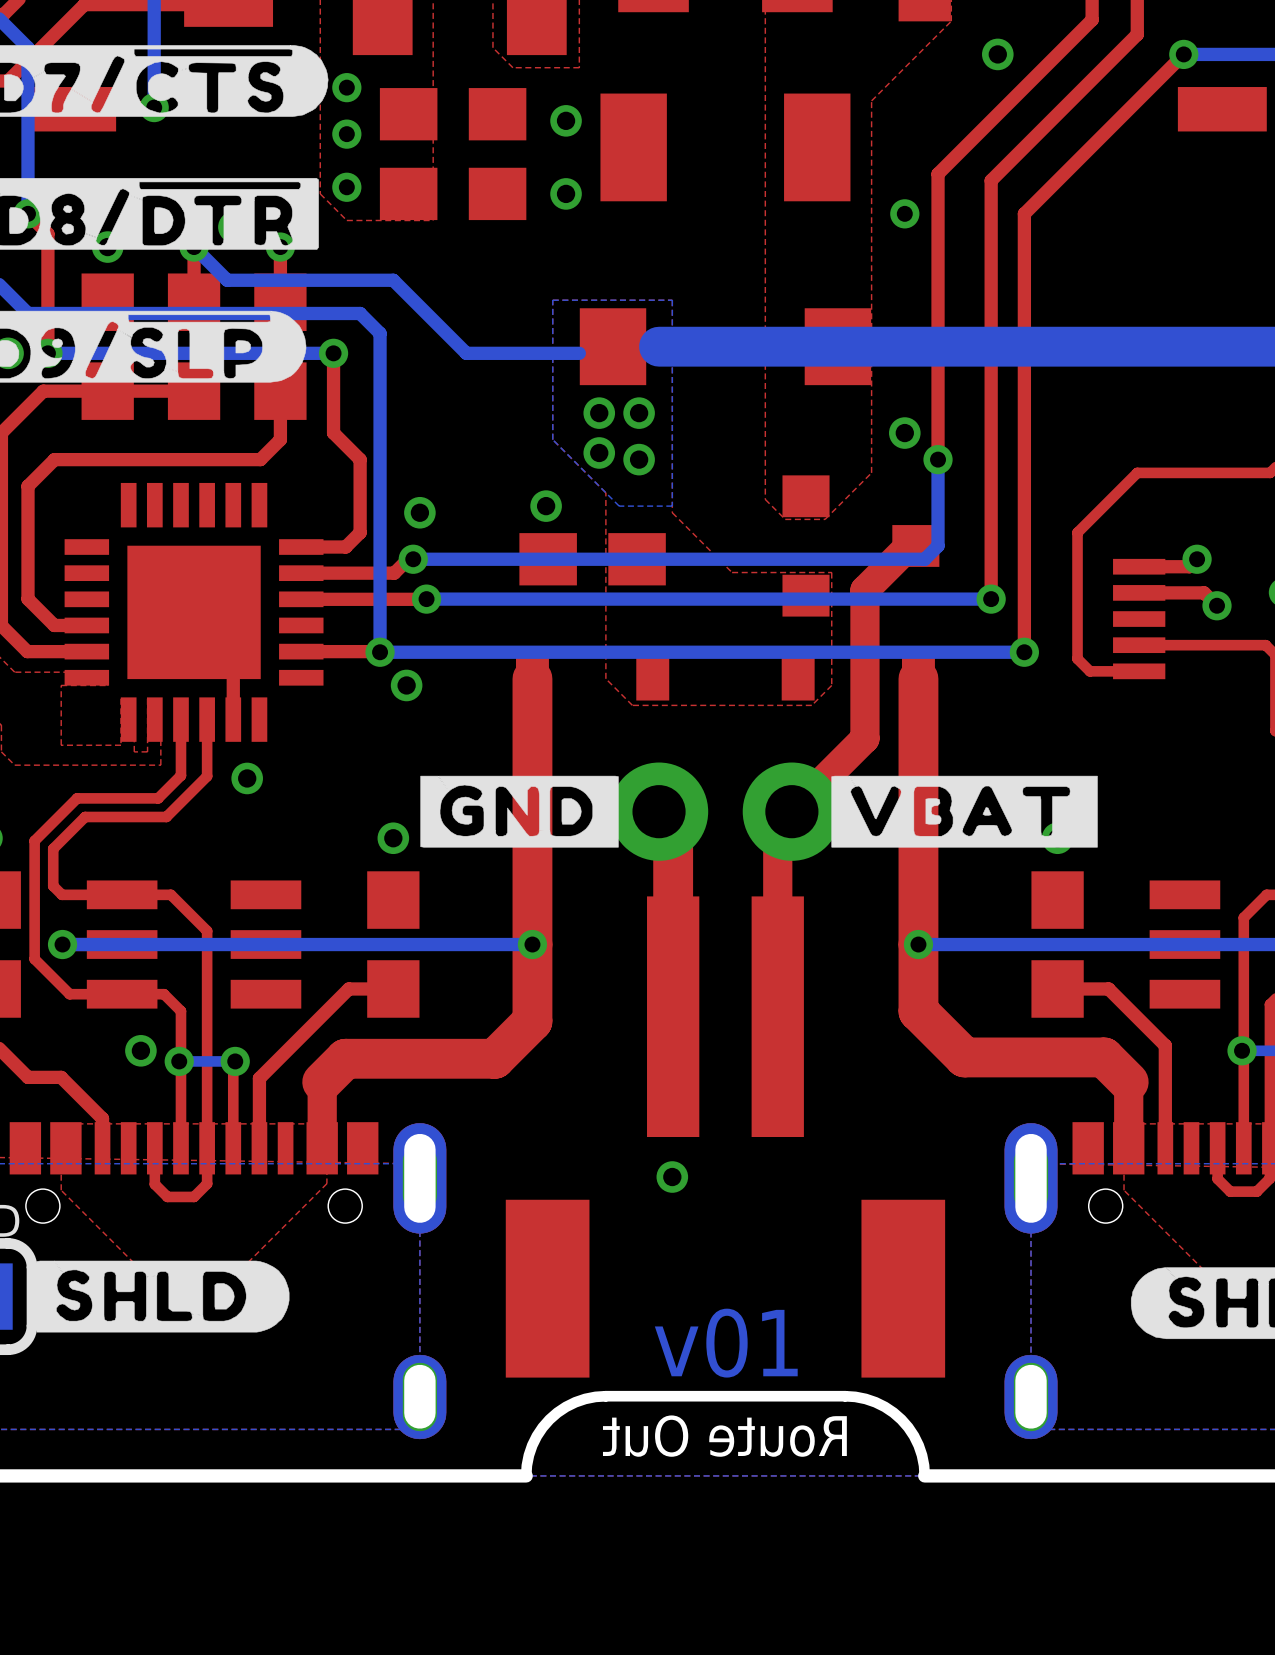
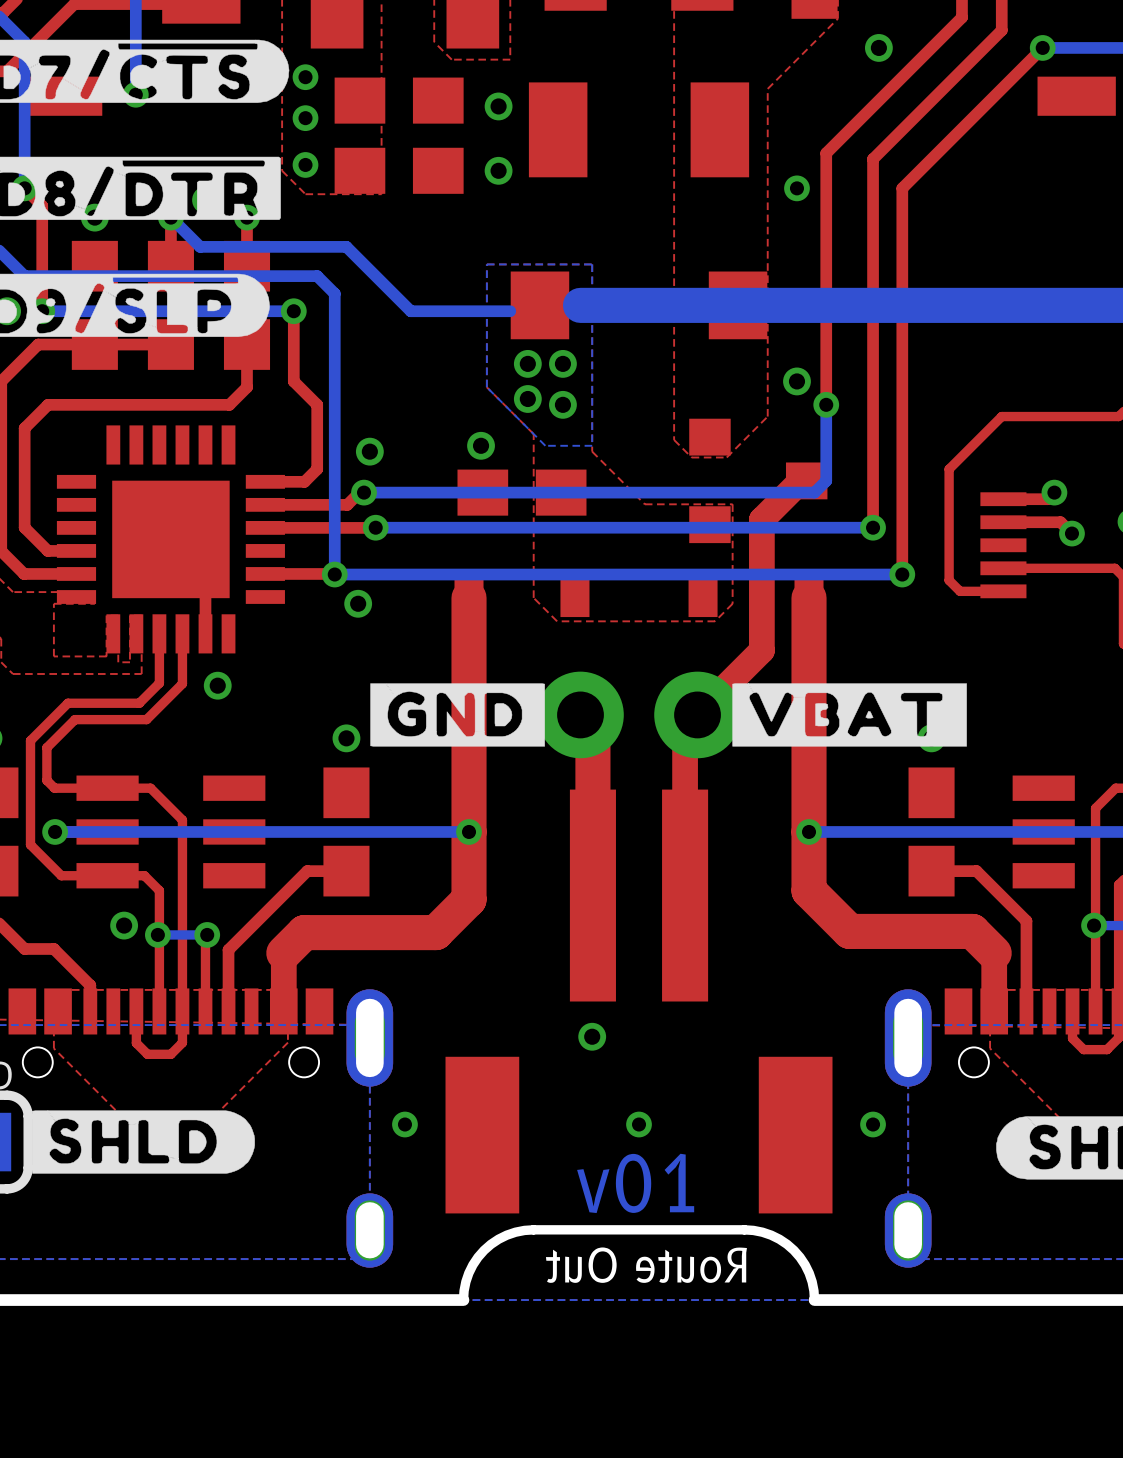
via: none -> (404, 1124)
via: none -> (639, 1124)
via: none -> (873, 1124)

